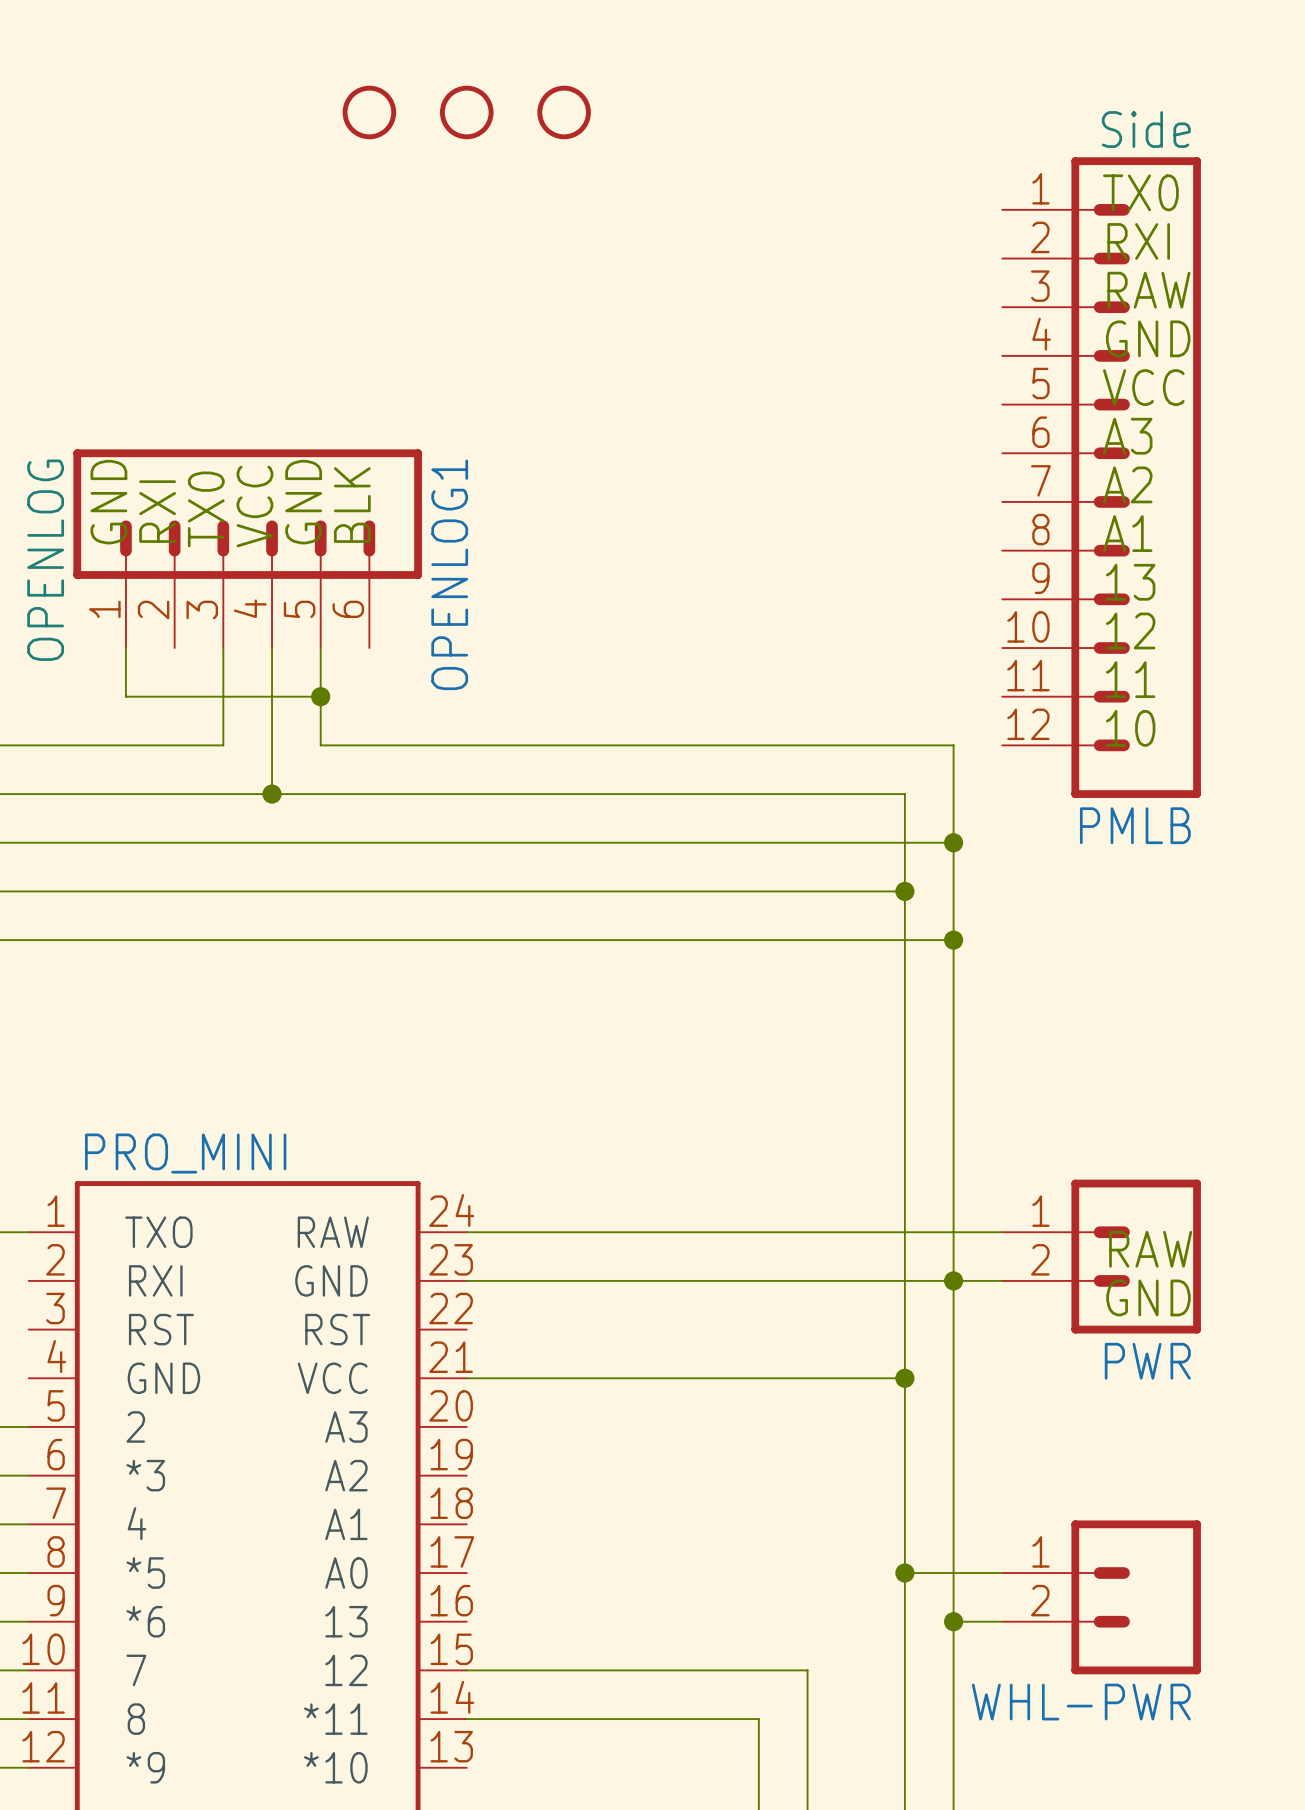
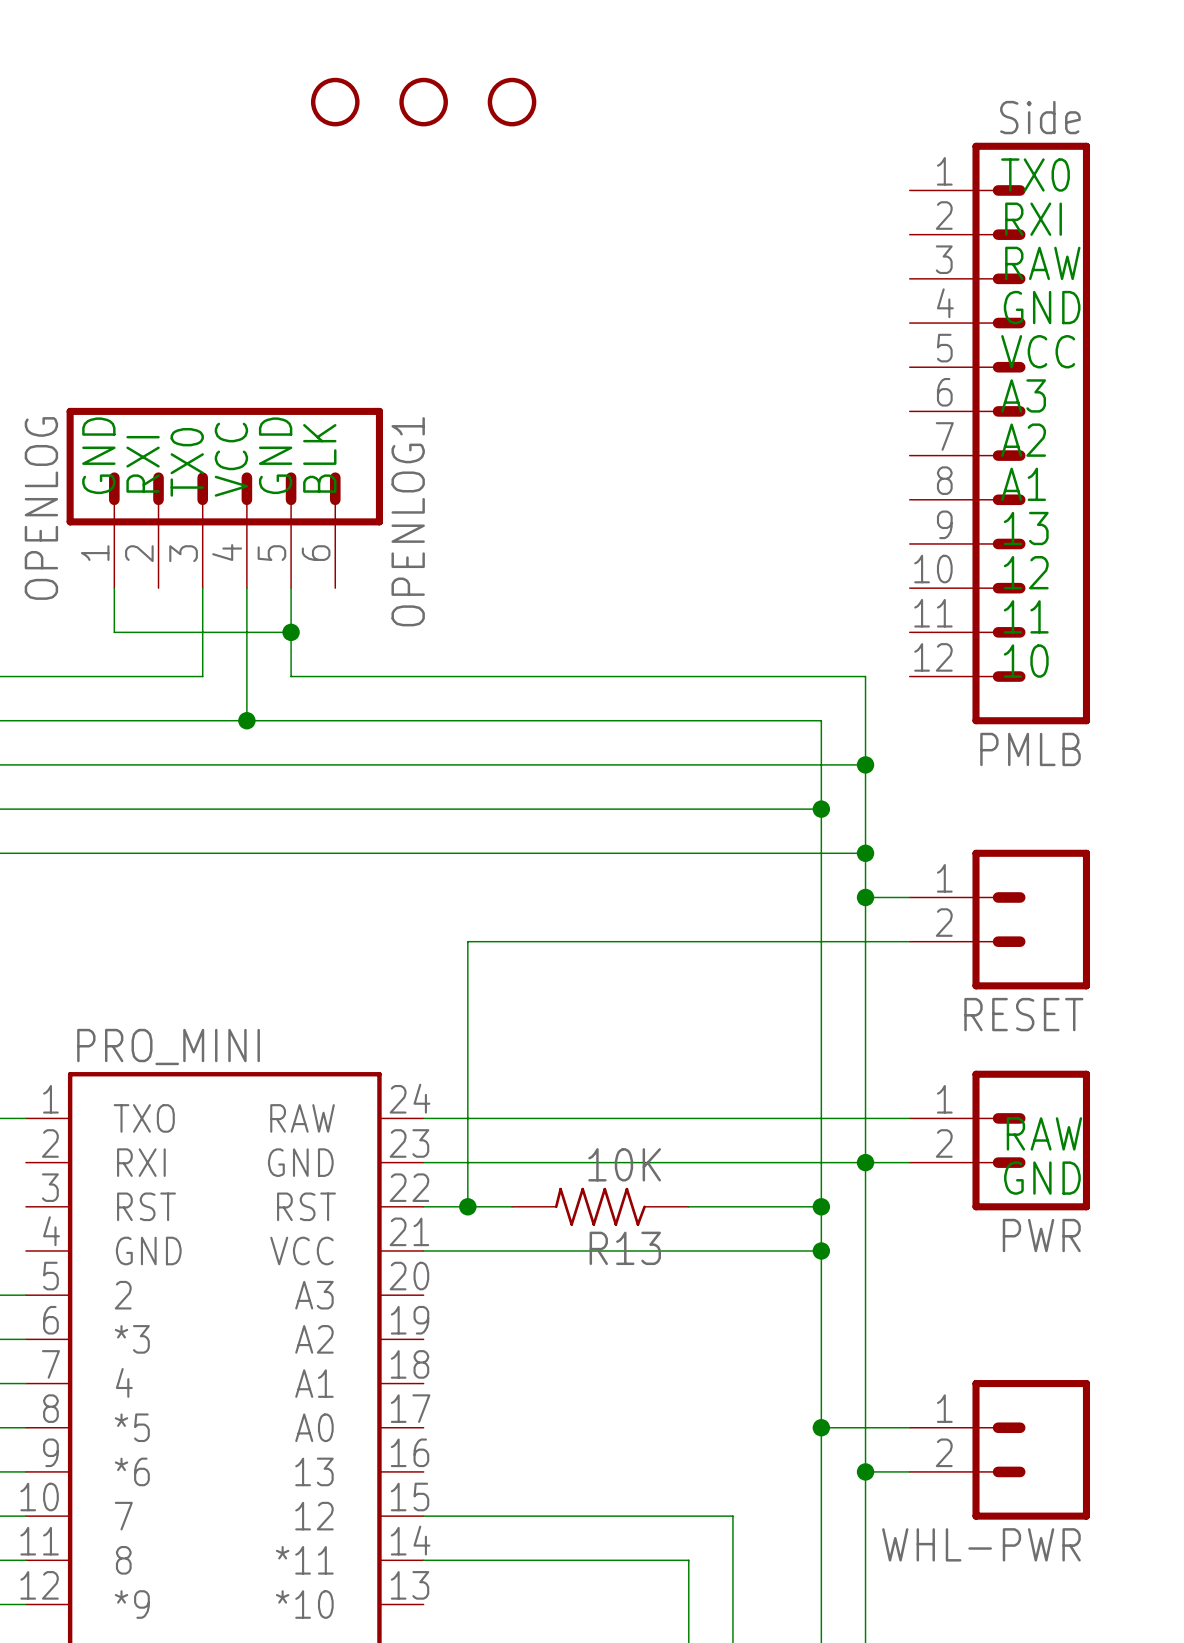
wire: none -> (865, 897) (909, 897)
junction: none -> (865, 897)
RESET: none -> (999, 919)
wire: none -> (909, 941) (467, 941) (467, 1206)
wire: none -> (423, 1206) (512, 1206)
junction: none -> (467, 1206)
R13: none -> 10K (600, 1206)
wire: none -> (688, 1206) (821, 1206)
junction: none -> (821, 1206)

